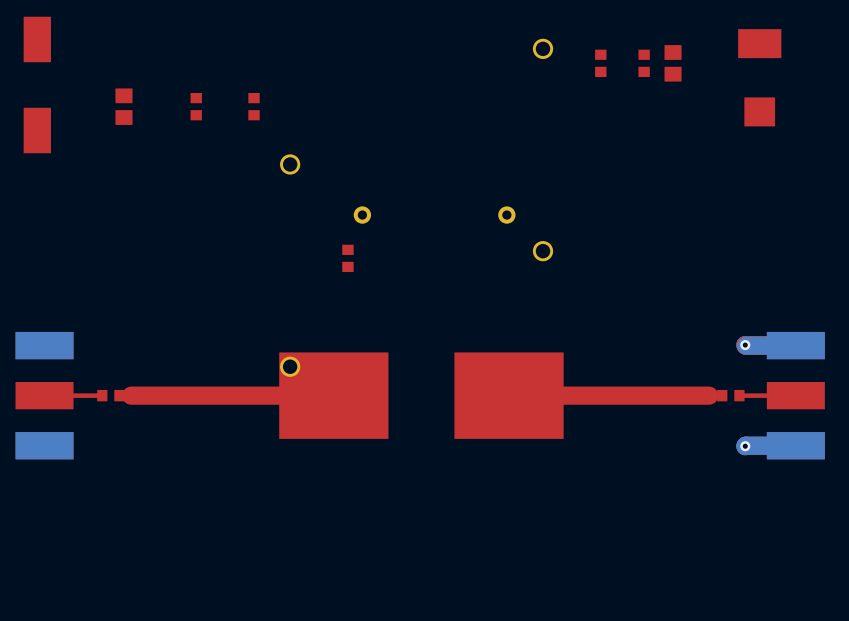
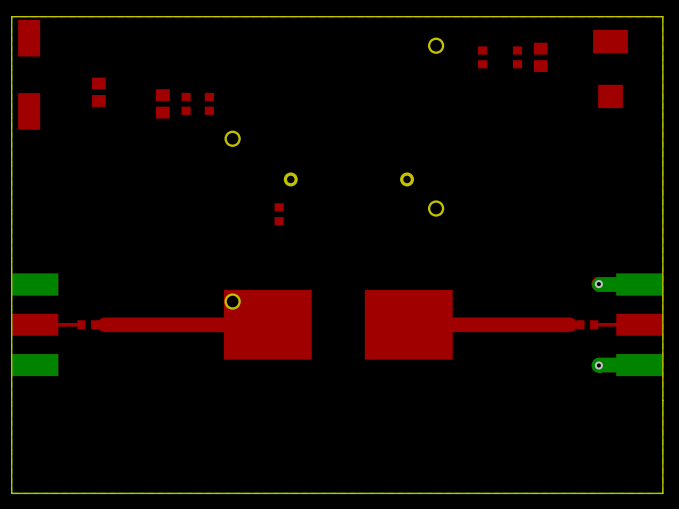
board edge: none -> (662, 16) (11, 16) (11, 493) (662, 493) (662, 16)
part: (196, 106) -> none
part: (254, 106) -> none
part: none -> (162, 103)
part: none -> (186, 103)
part: none -> (209, 103)

